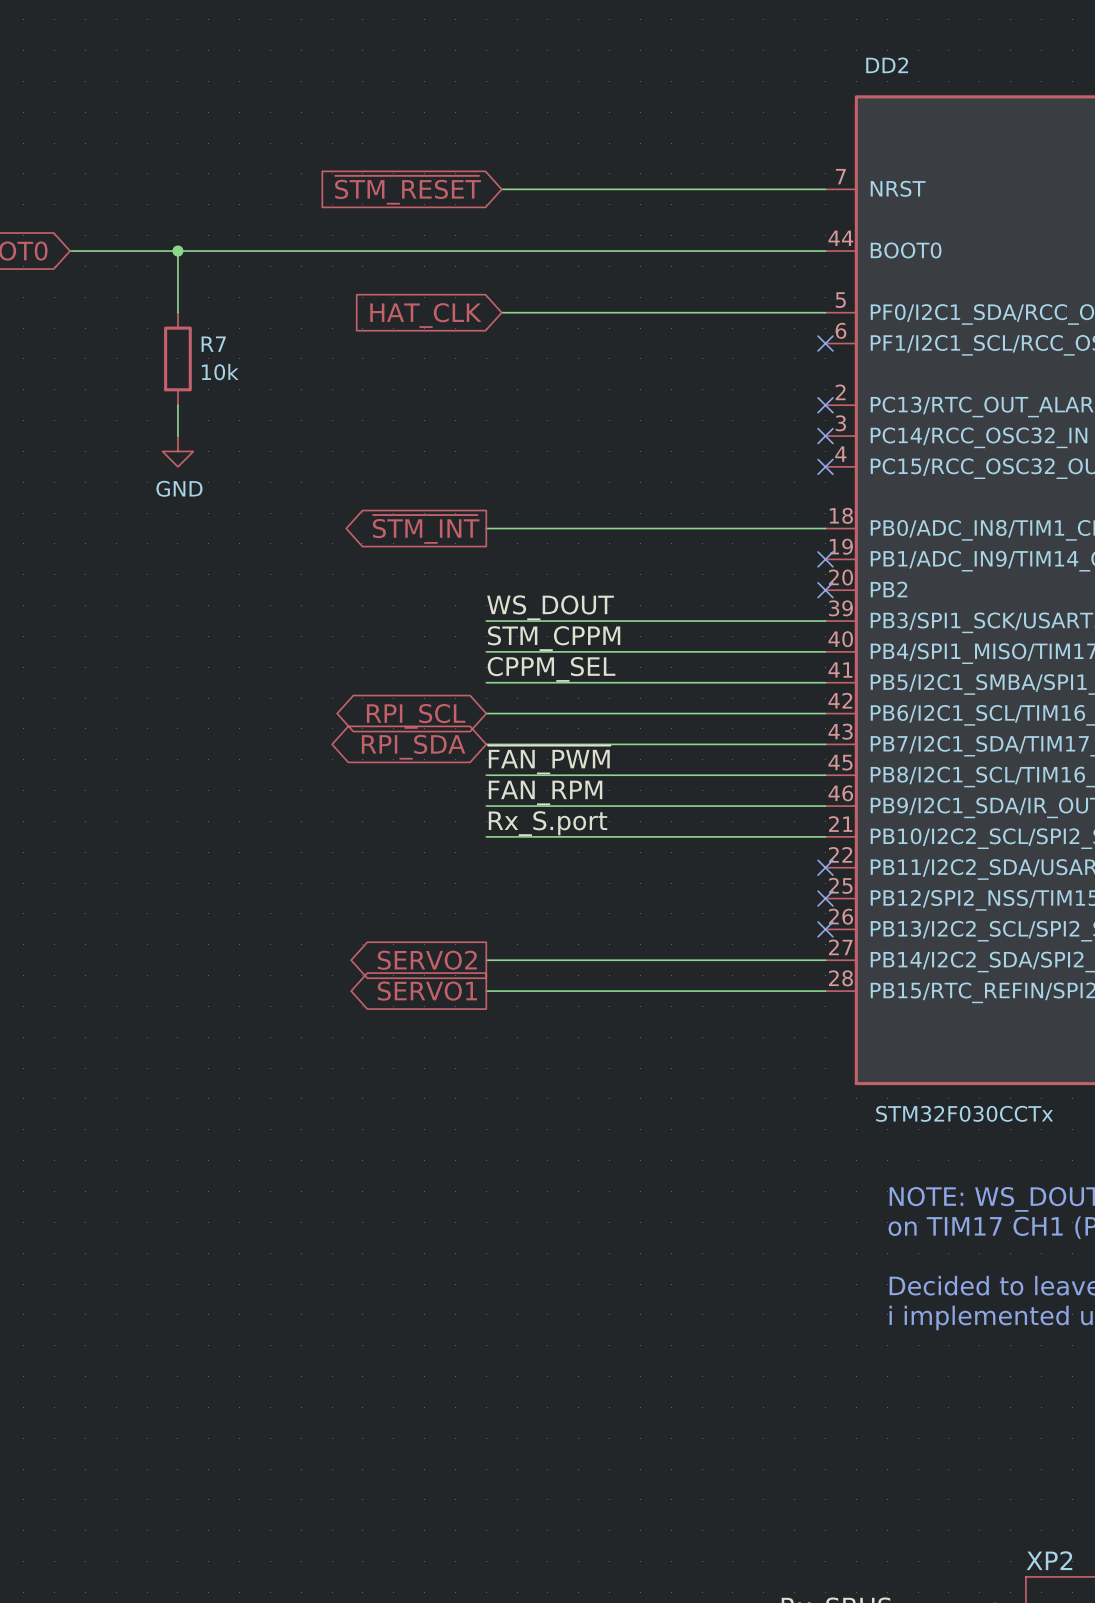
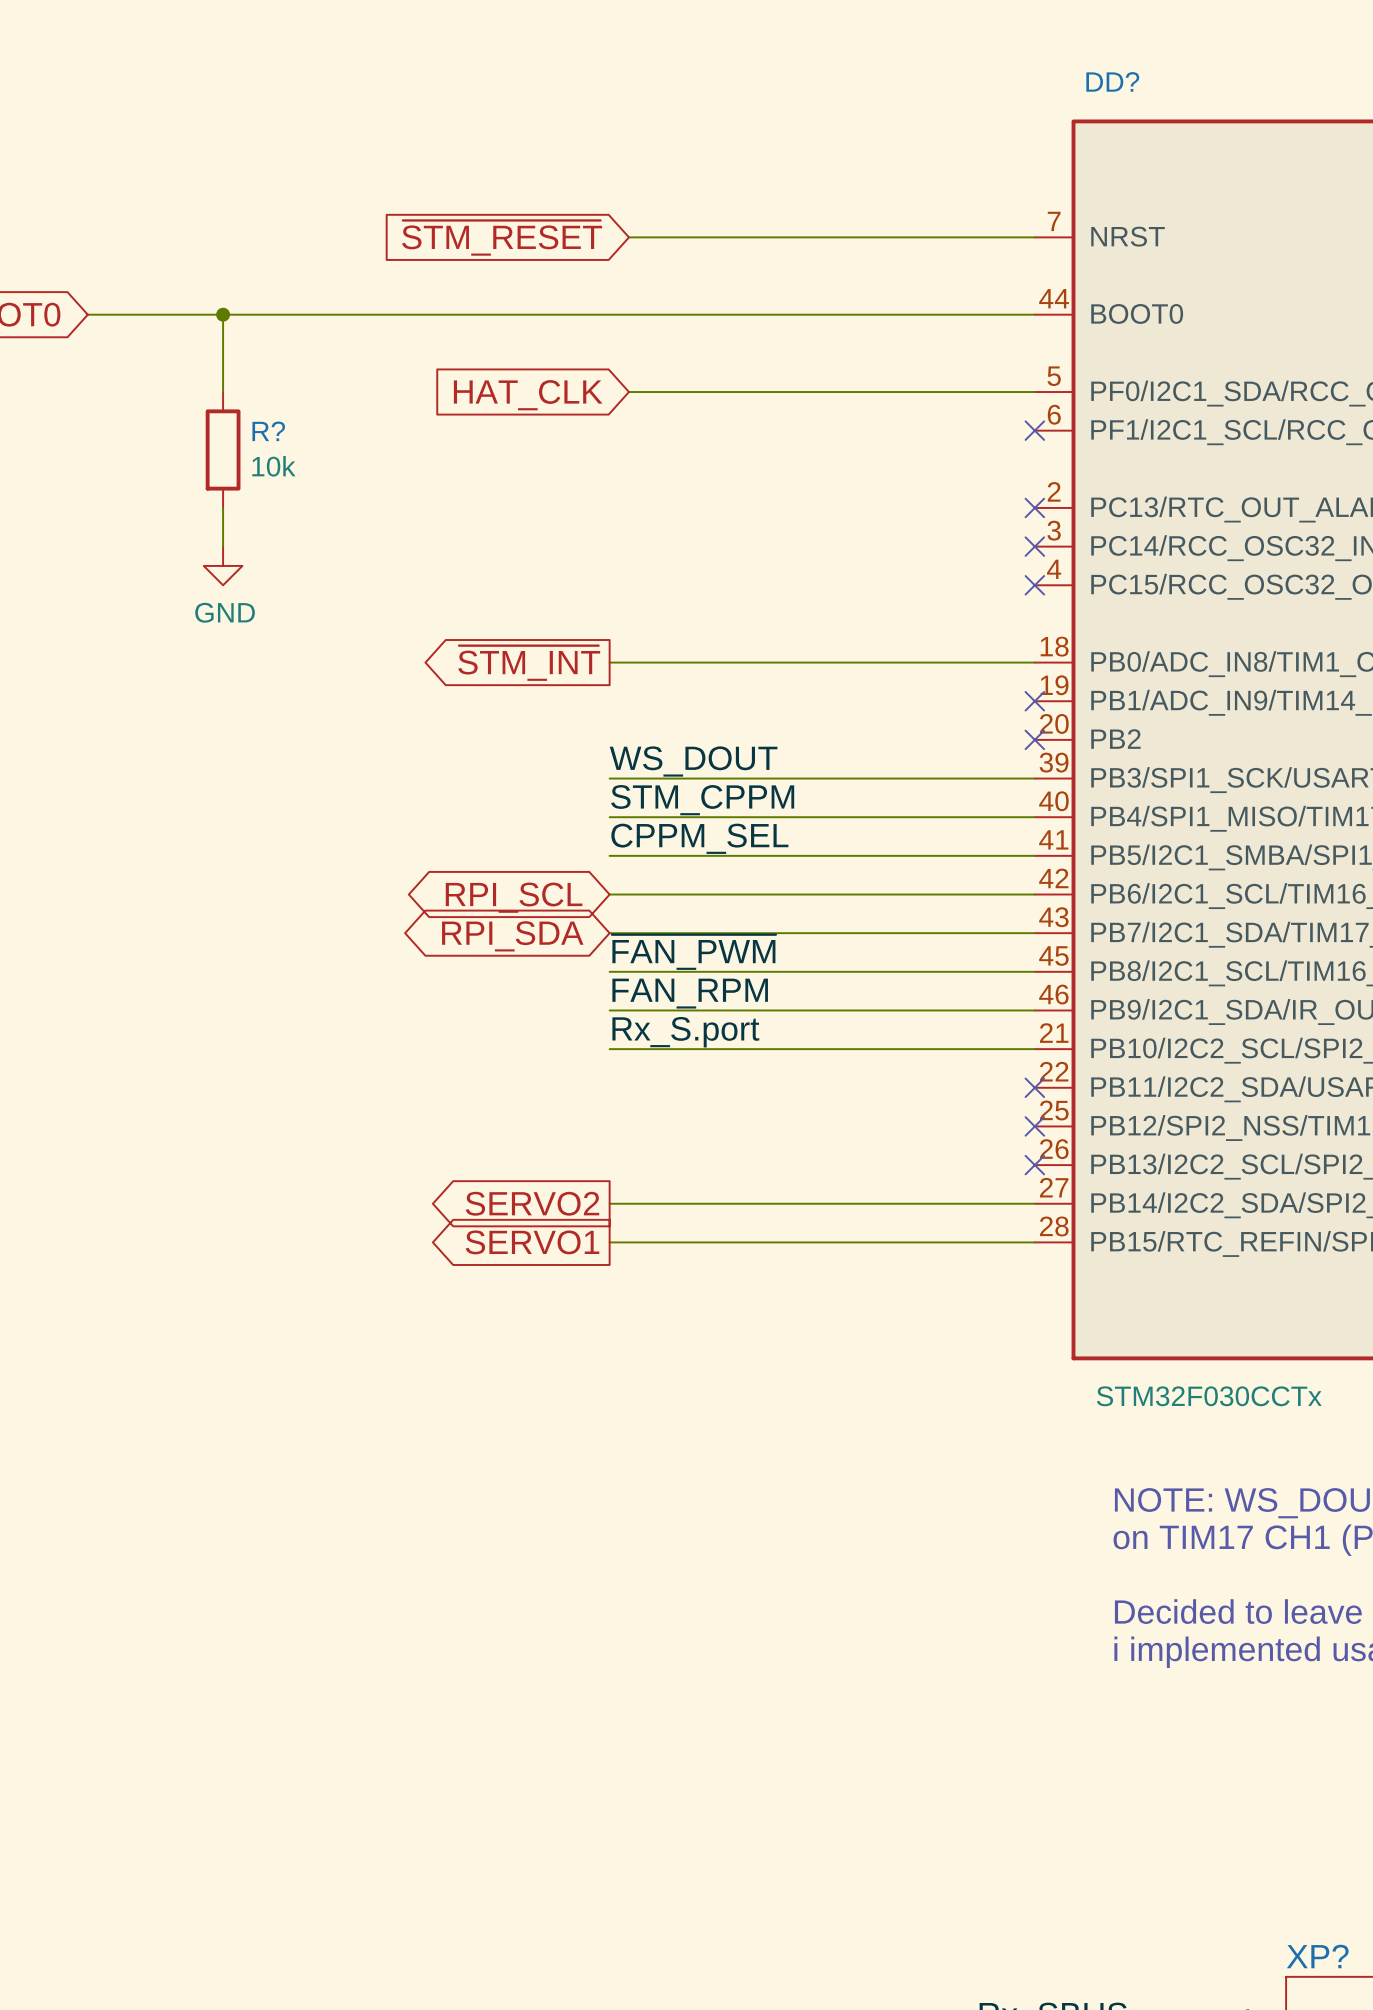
DD2 name: DD2 (887, 65) -> DD? (1112, 81)
R7 name: R7 (213, 344) -> R? (268, 431)
XP2 name: XP2 (1049, 1560) -> XP? (1317, 1956)

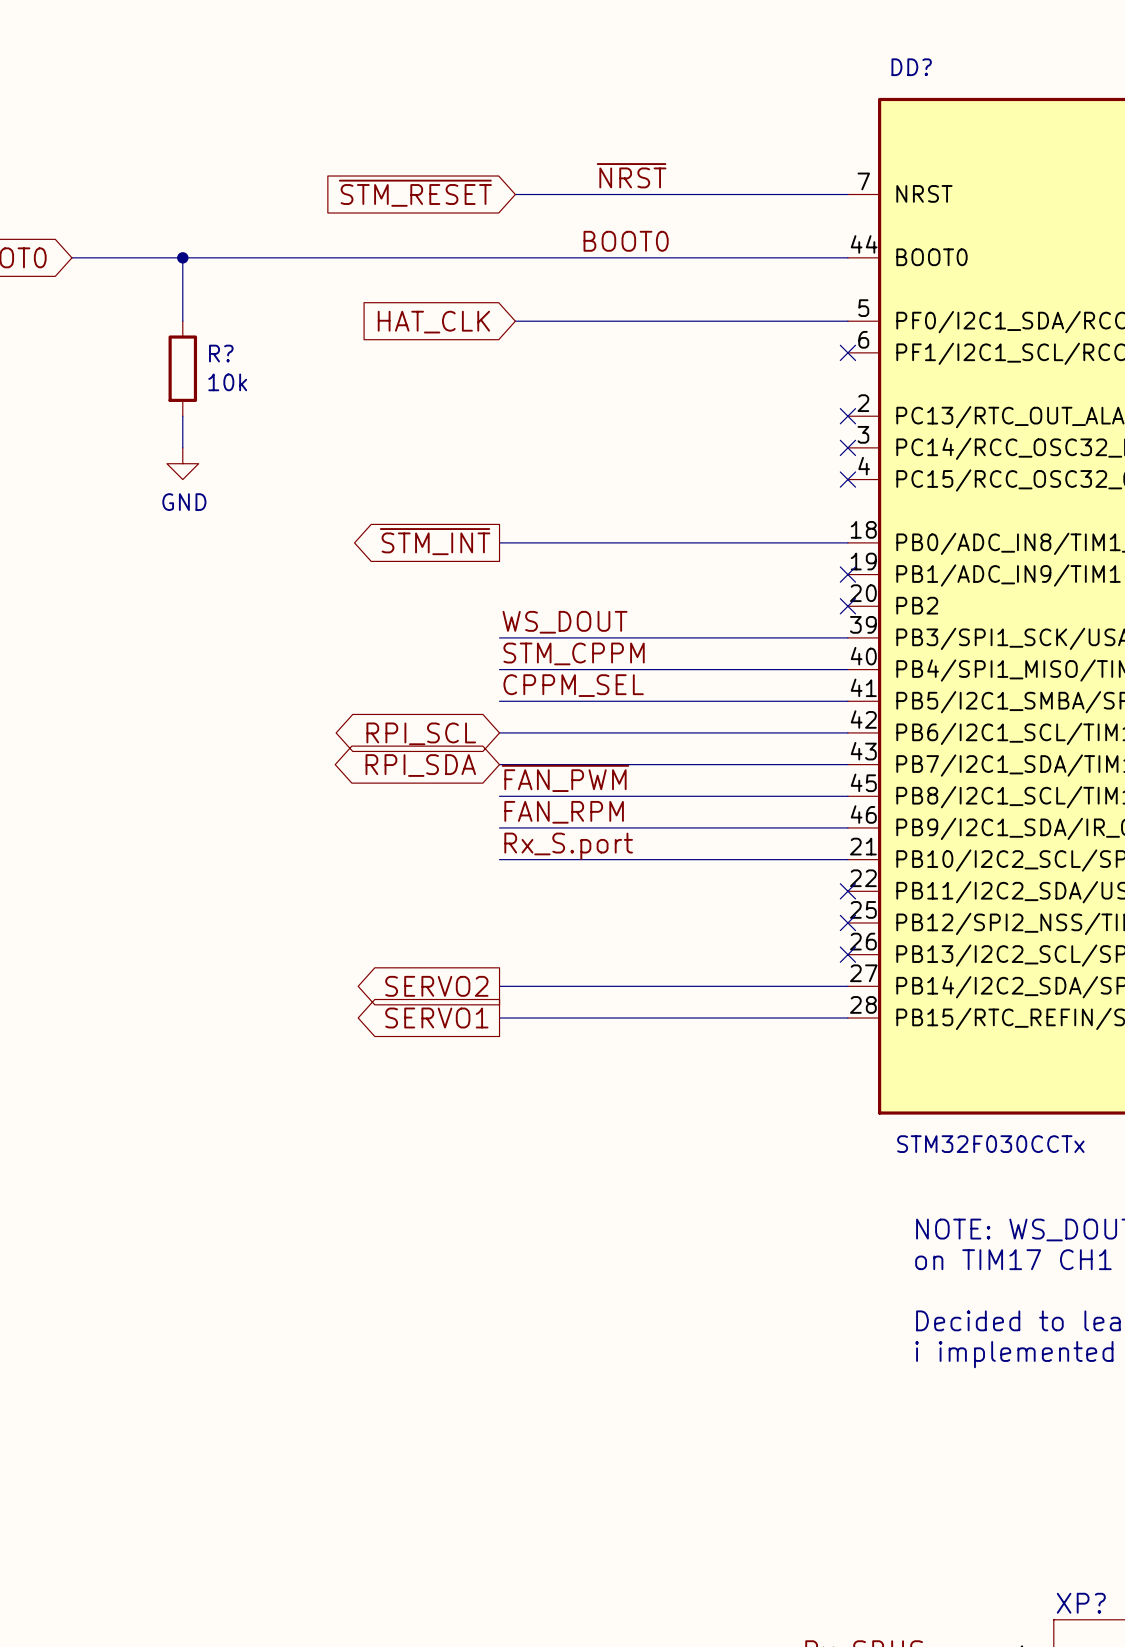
label: none -> ~{NRST} (631, 175)
label: none -> BOOT0 (626, 241)

